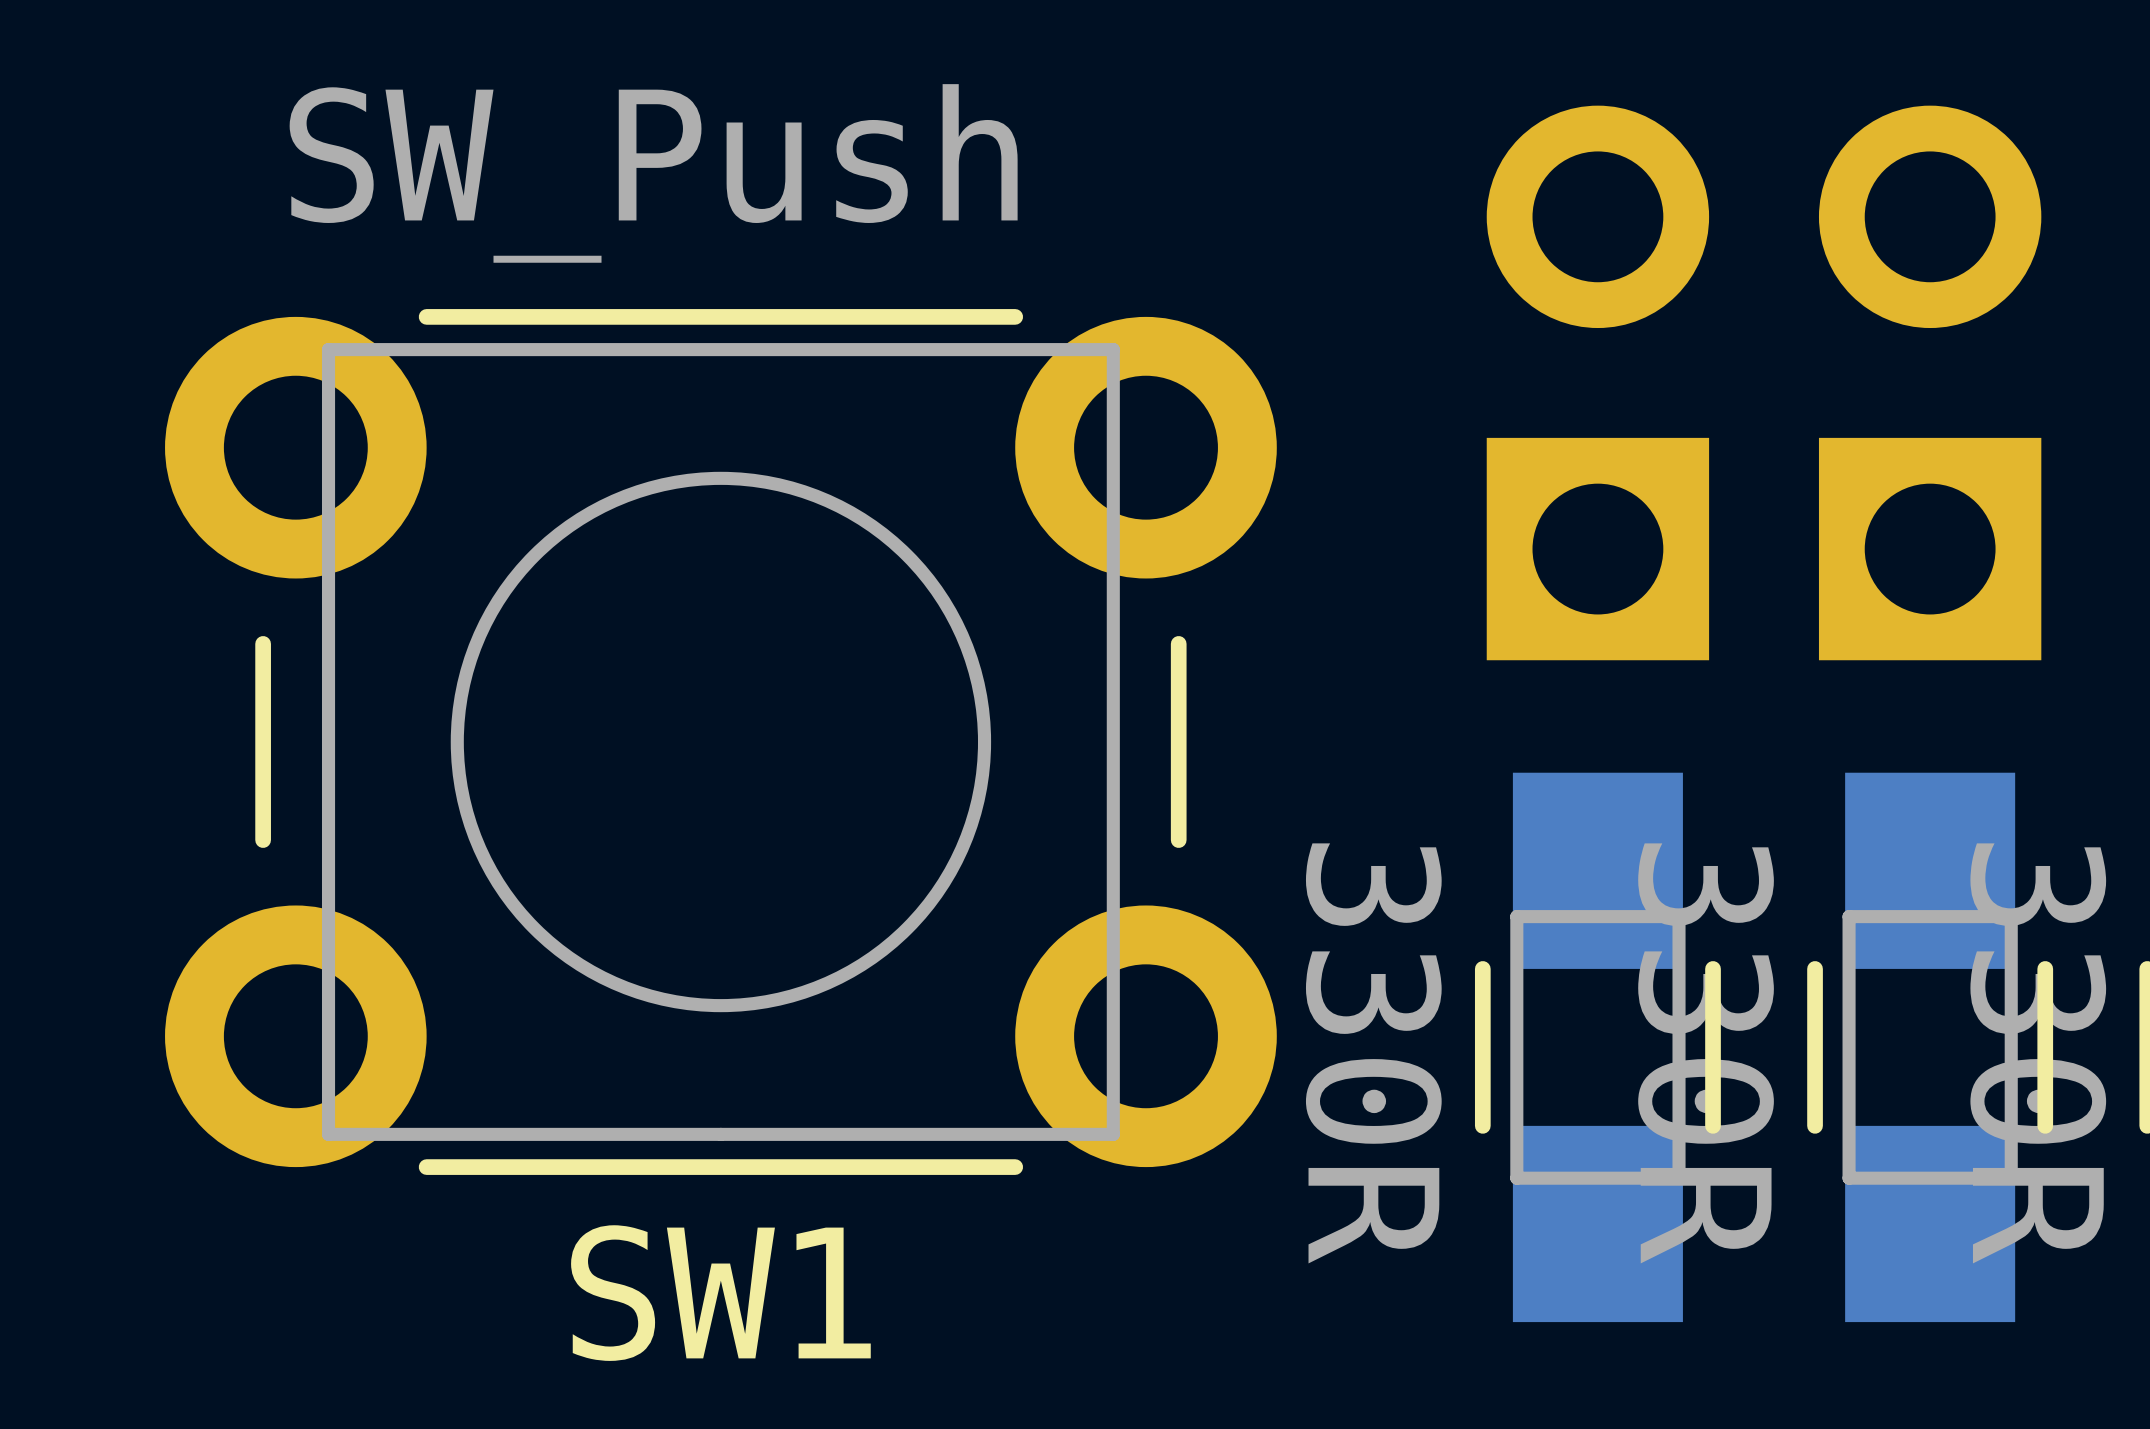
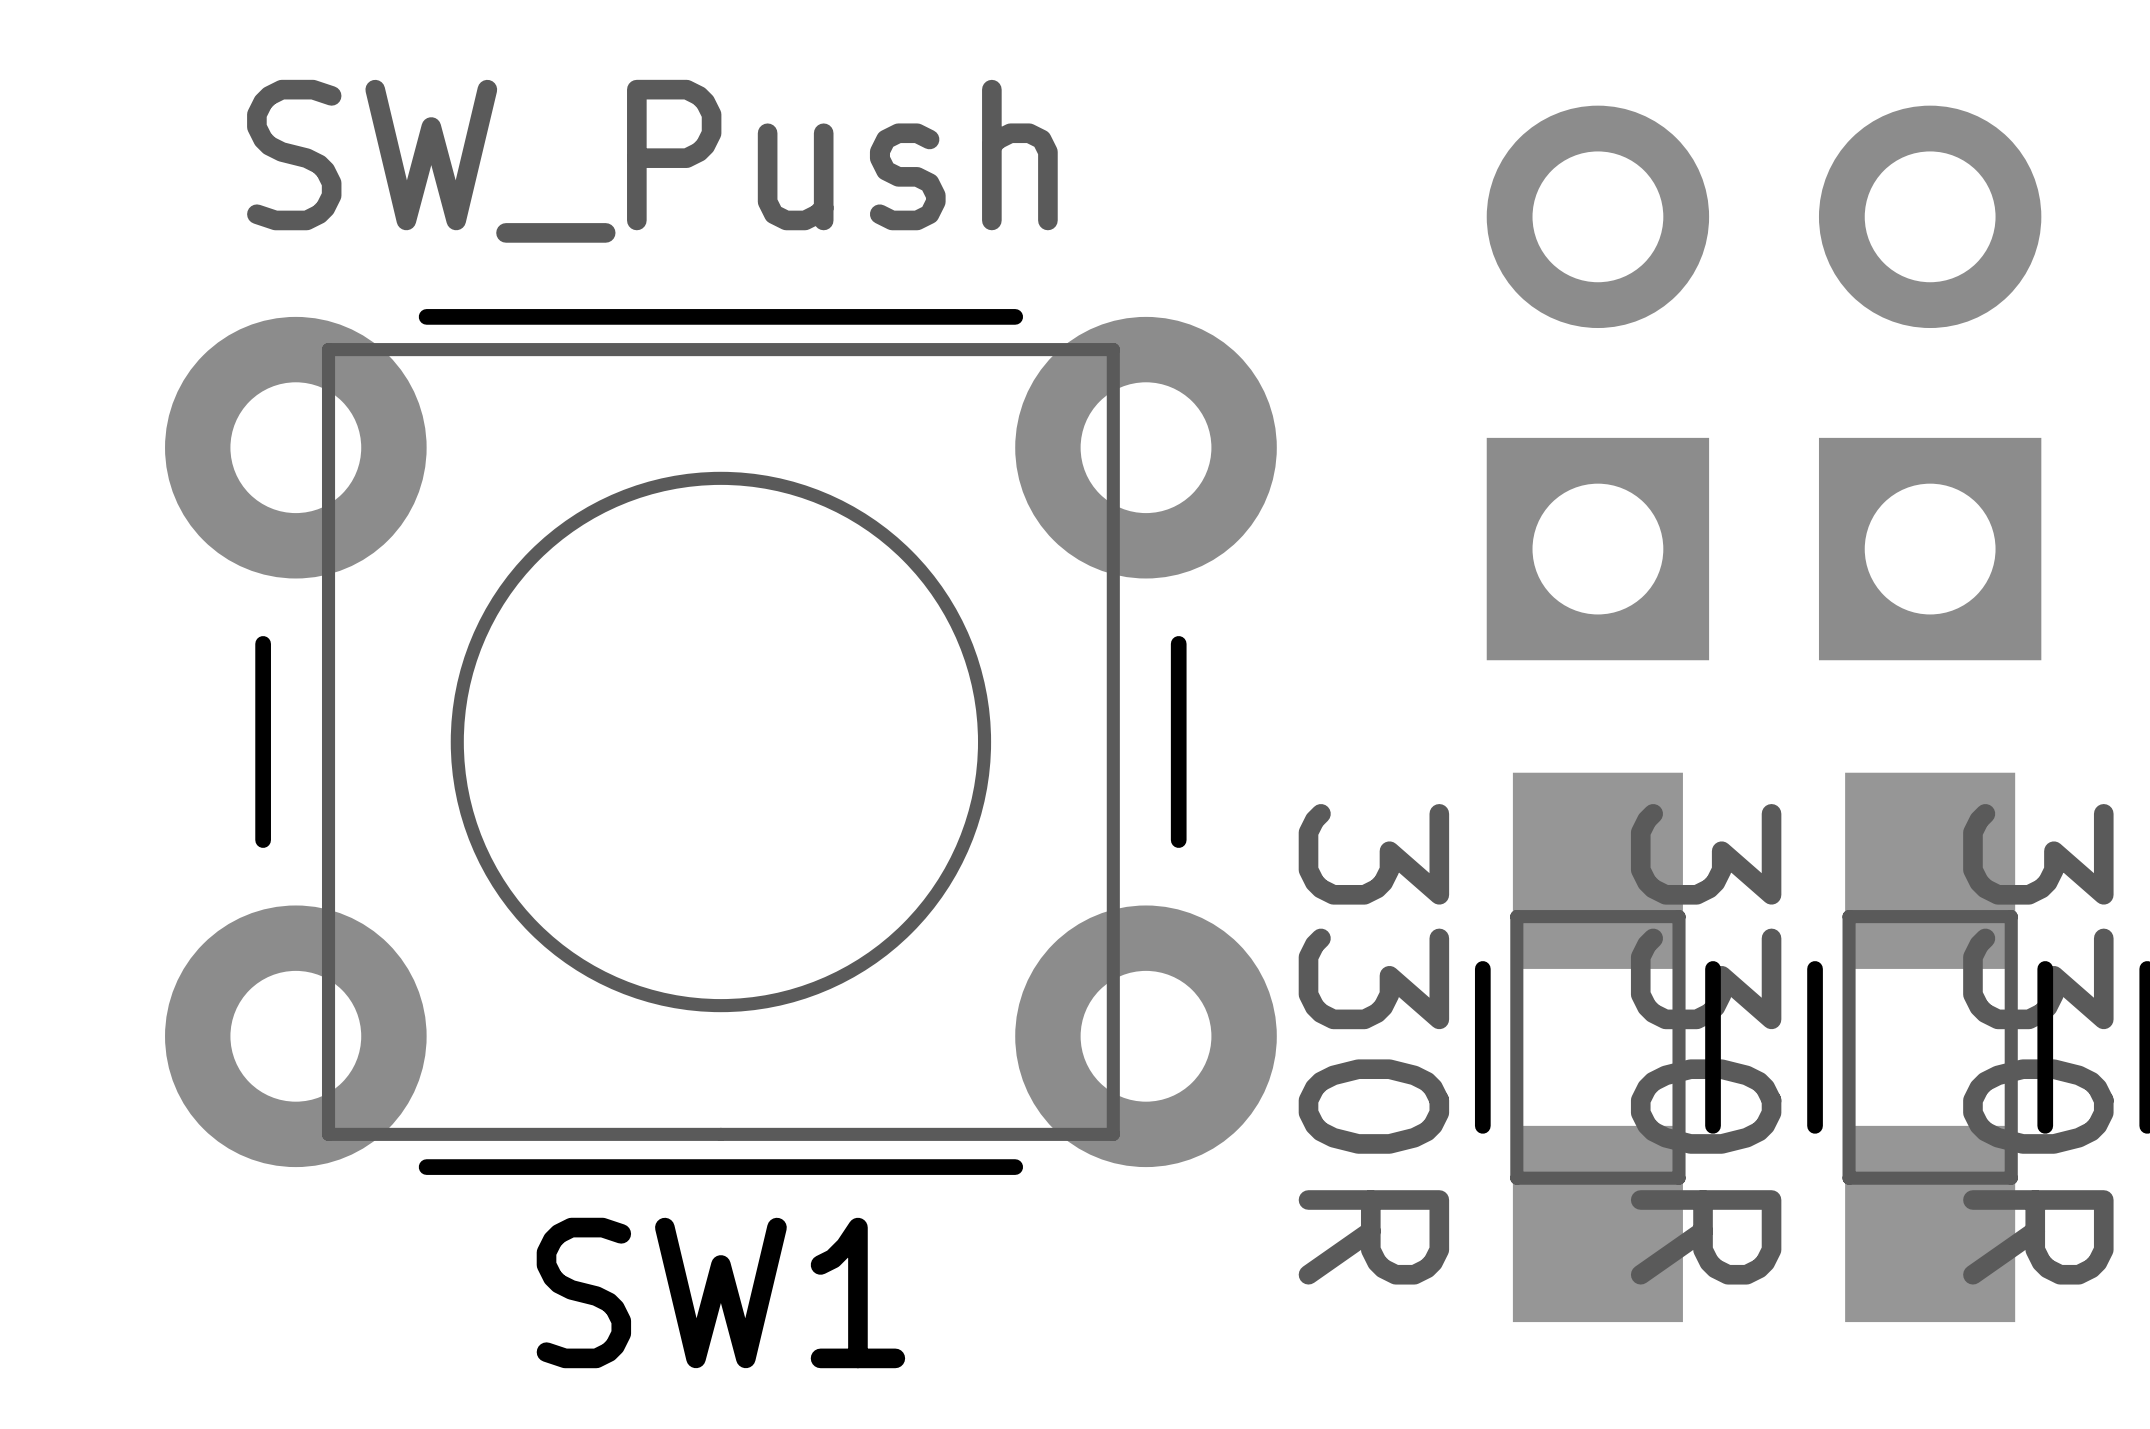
SW1 footprint: [165, 309, 1277, 1175] -> [165, 309, 1277, 1175]

